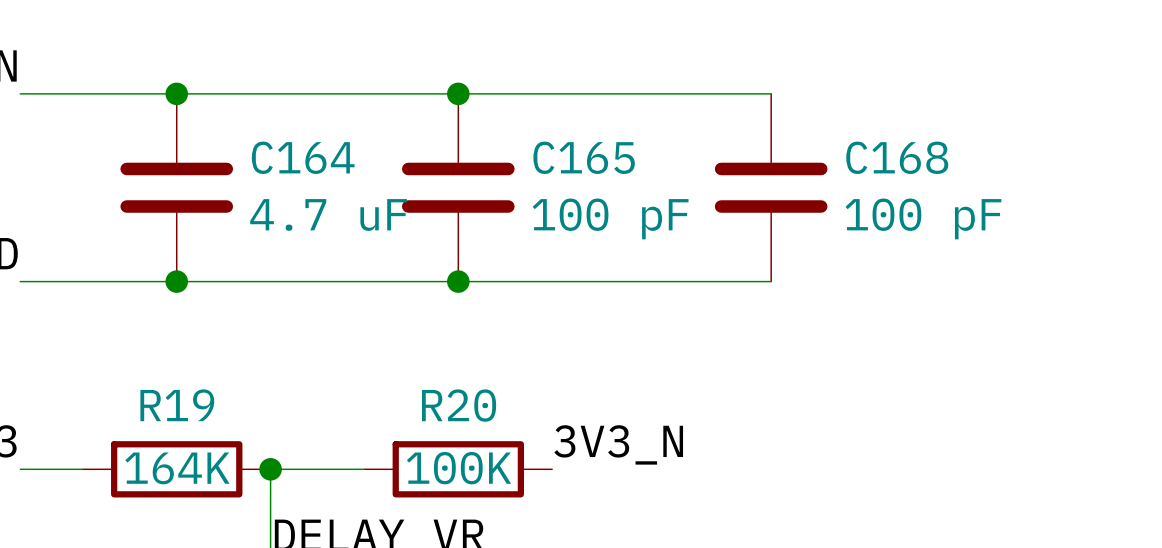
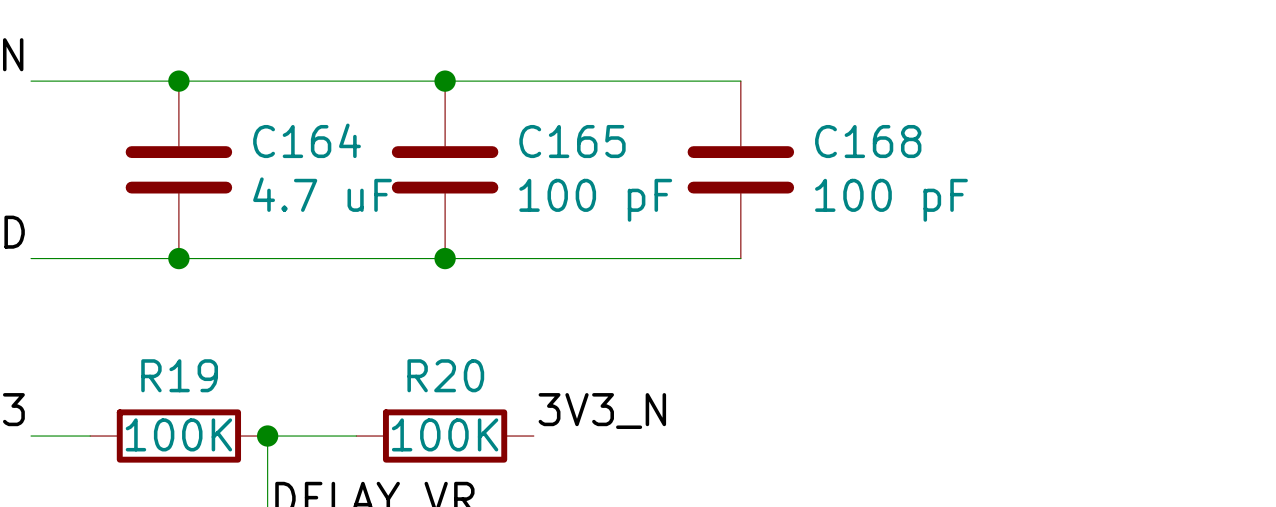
R19 value: 164K (177, 468) -> 100K (178, 434)

